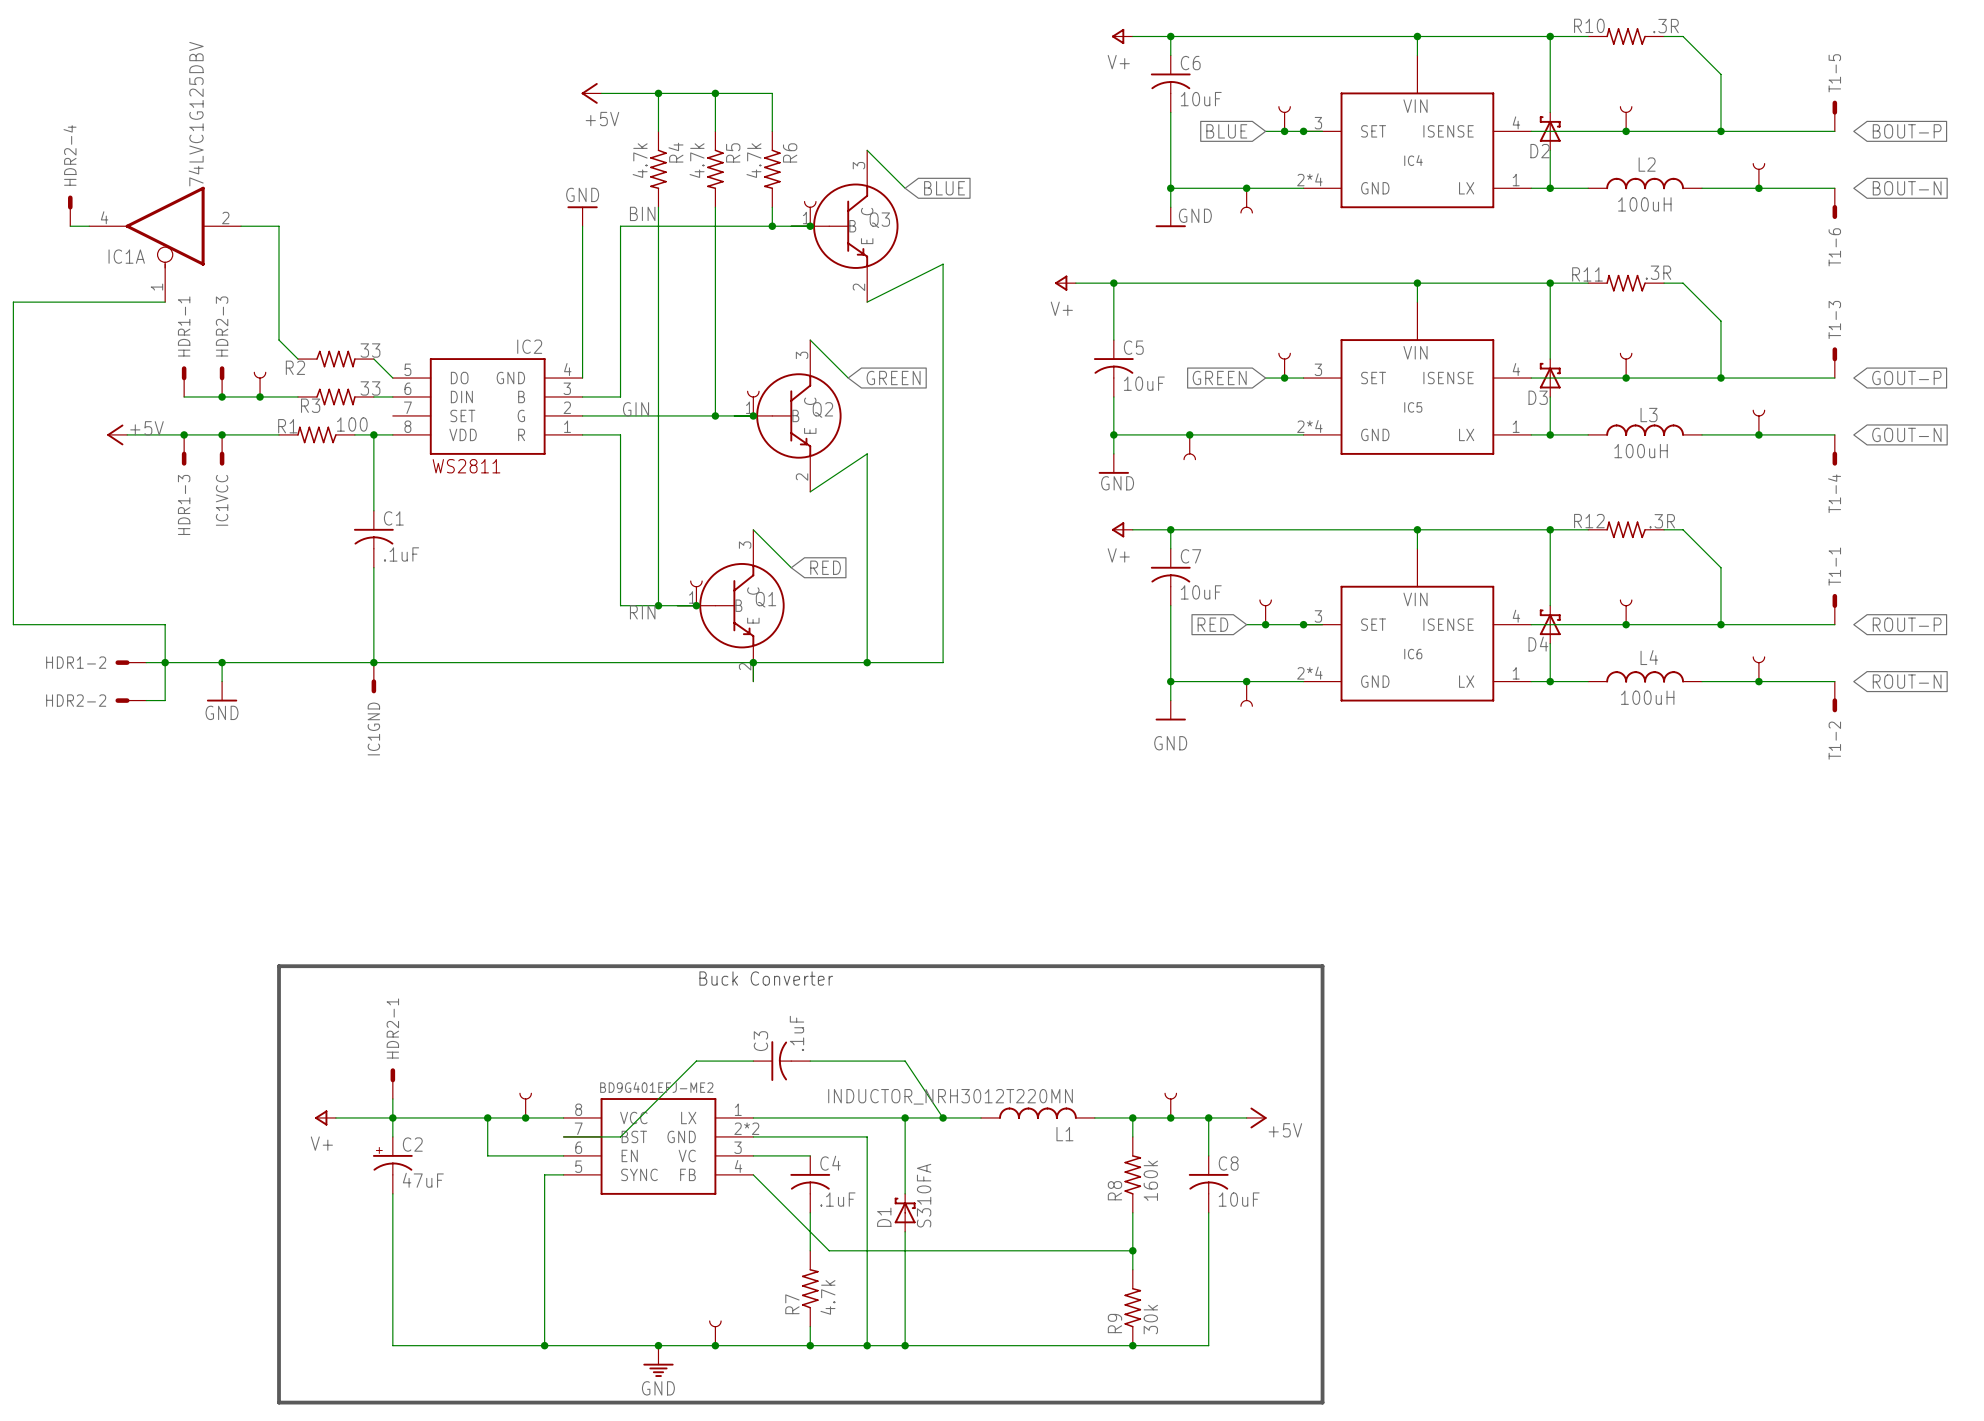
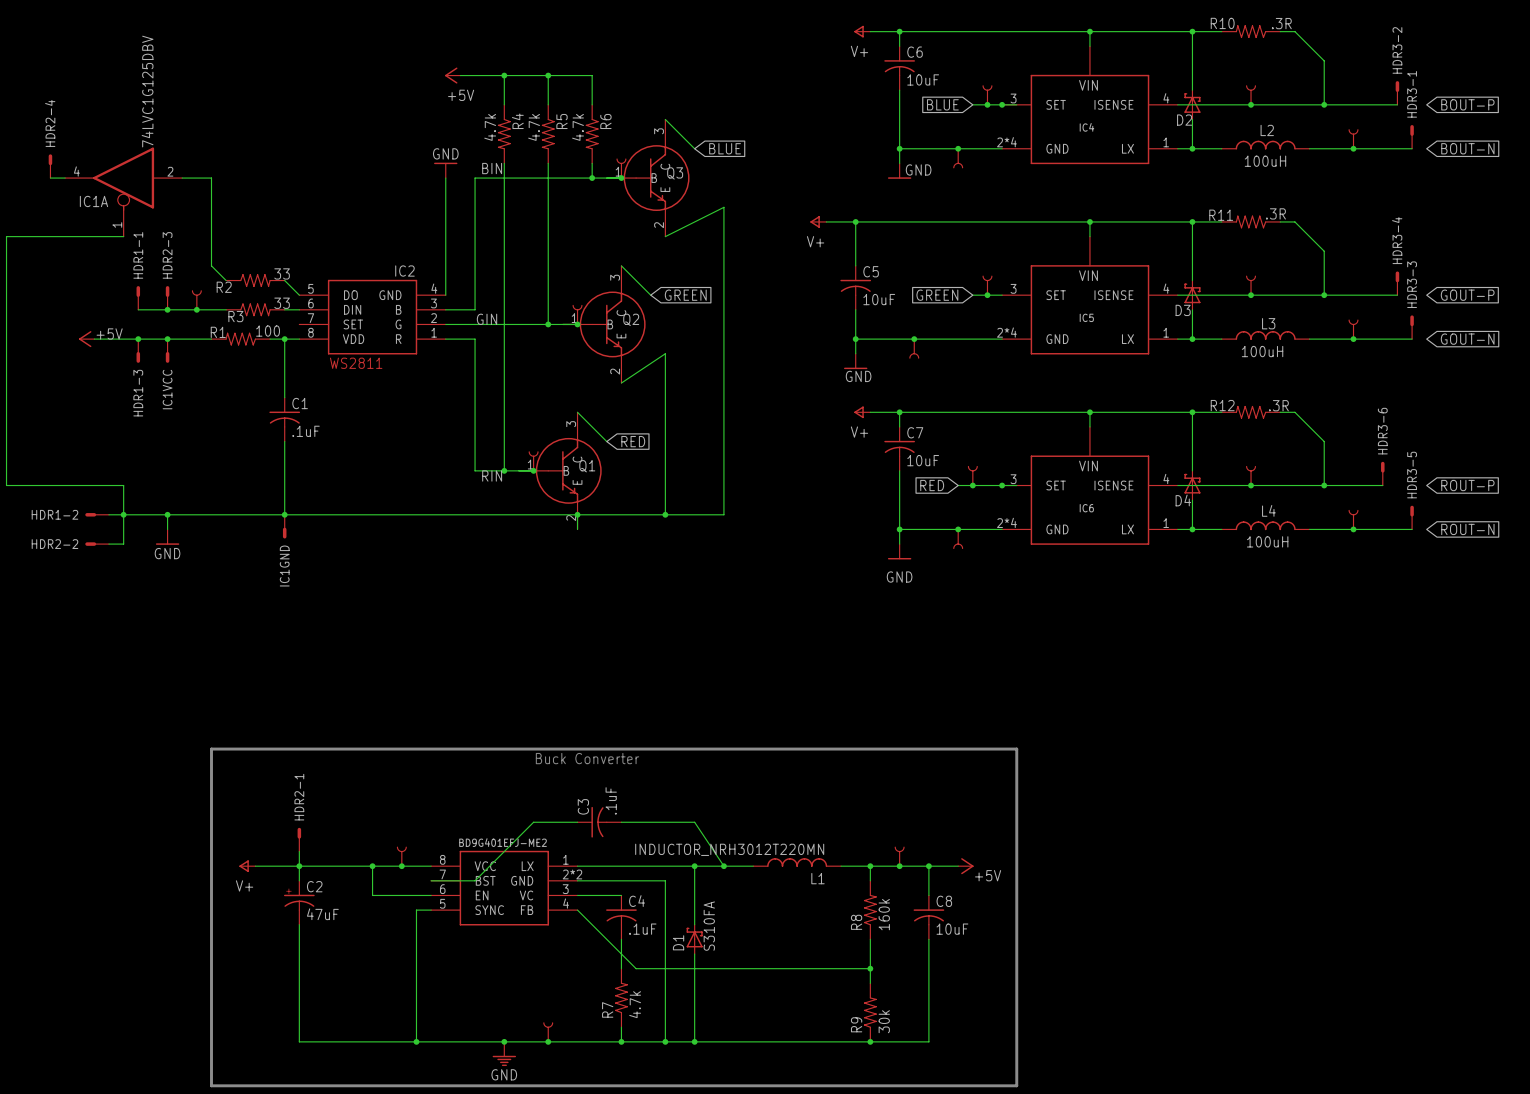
HDR3-2: none -> (1397, 92)
T1-5: (1834, 115) -> none
wire: (1815, 131) (1834, 131) -> none
HDR3-1: none -> (1412, 136)
T1-6: (1834, 203) -> none
HDR3-4: none -> (1397, 283)
T1-3: (1834, 362) -> none
wire: (1815, 378) (1834, 378) -> none
HDR3-3: none -> (1412, 327)
T1-4: (1834, 450) -> none
HDR3-6: none -> (1382, 473)
T1-1: (1834, 609) -> none
wire: (1796, 624) (1834, 624) -> none
HDR3-5: none -> (1412, 517)
T1-2: (1834, 696) -> none

